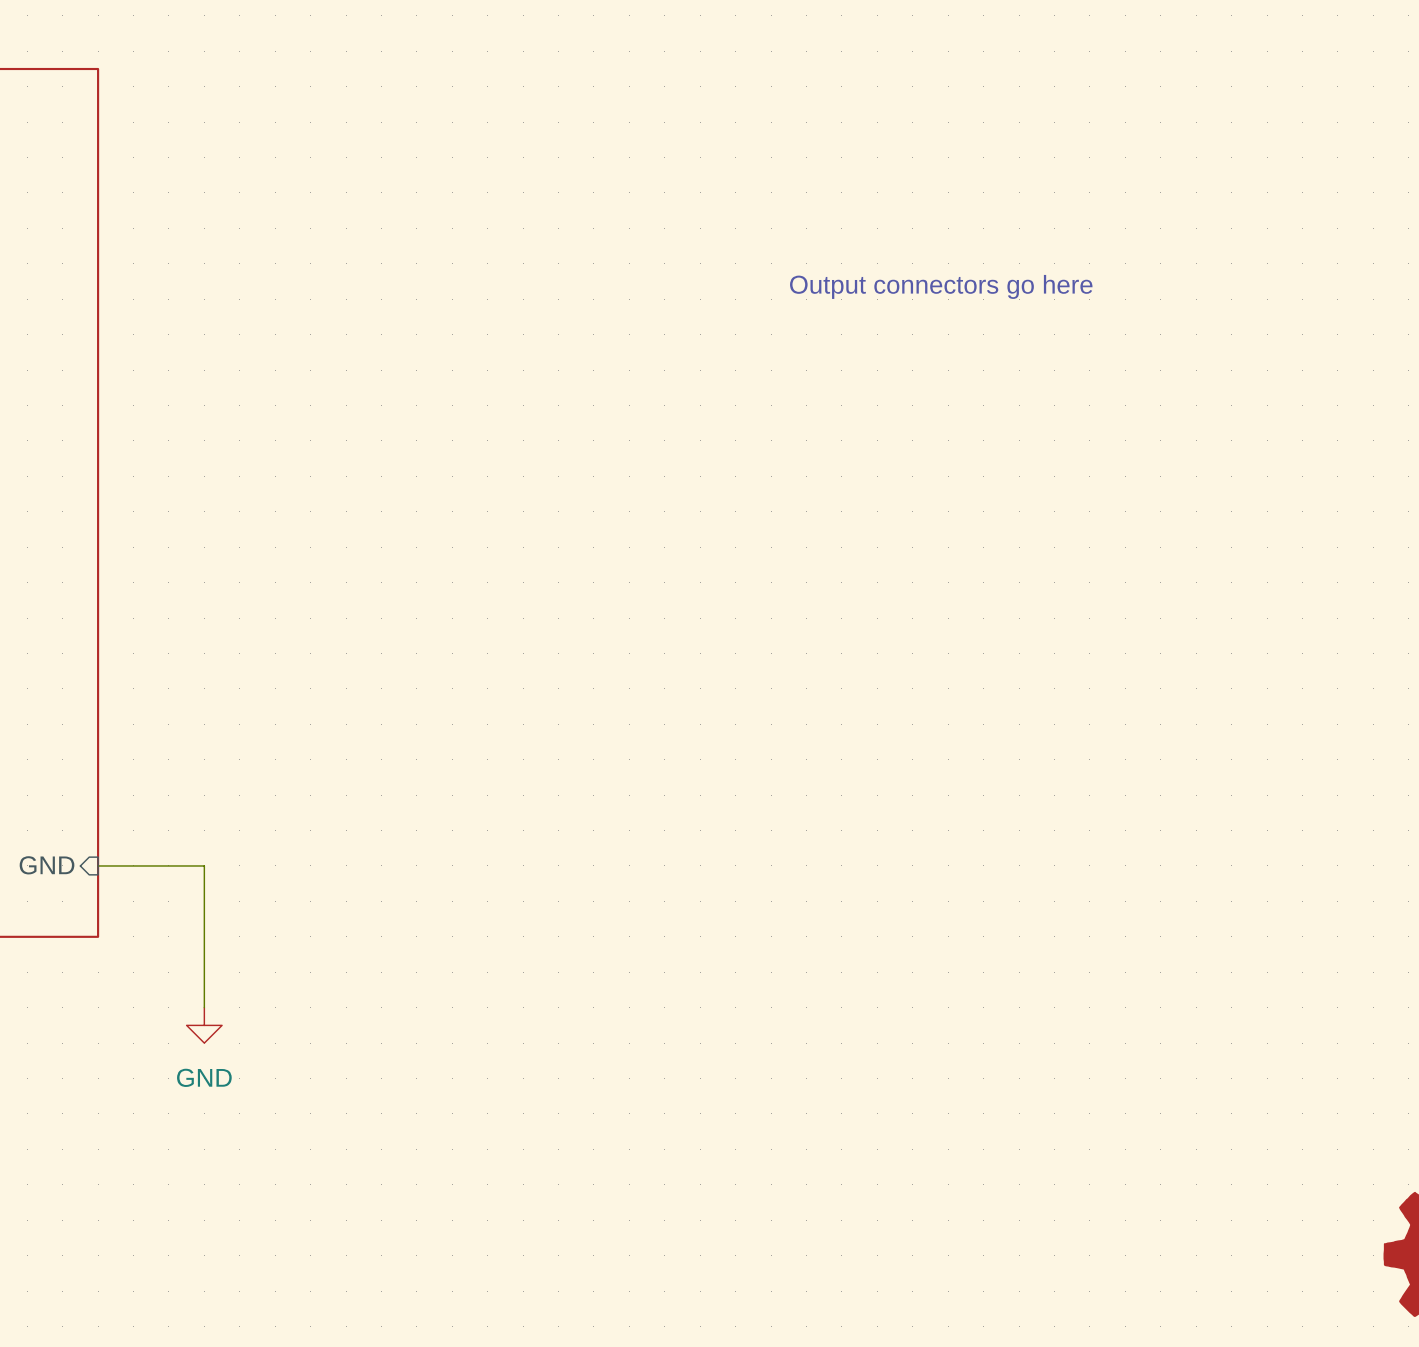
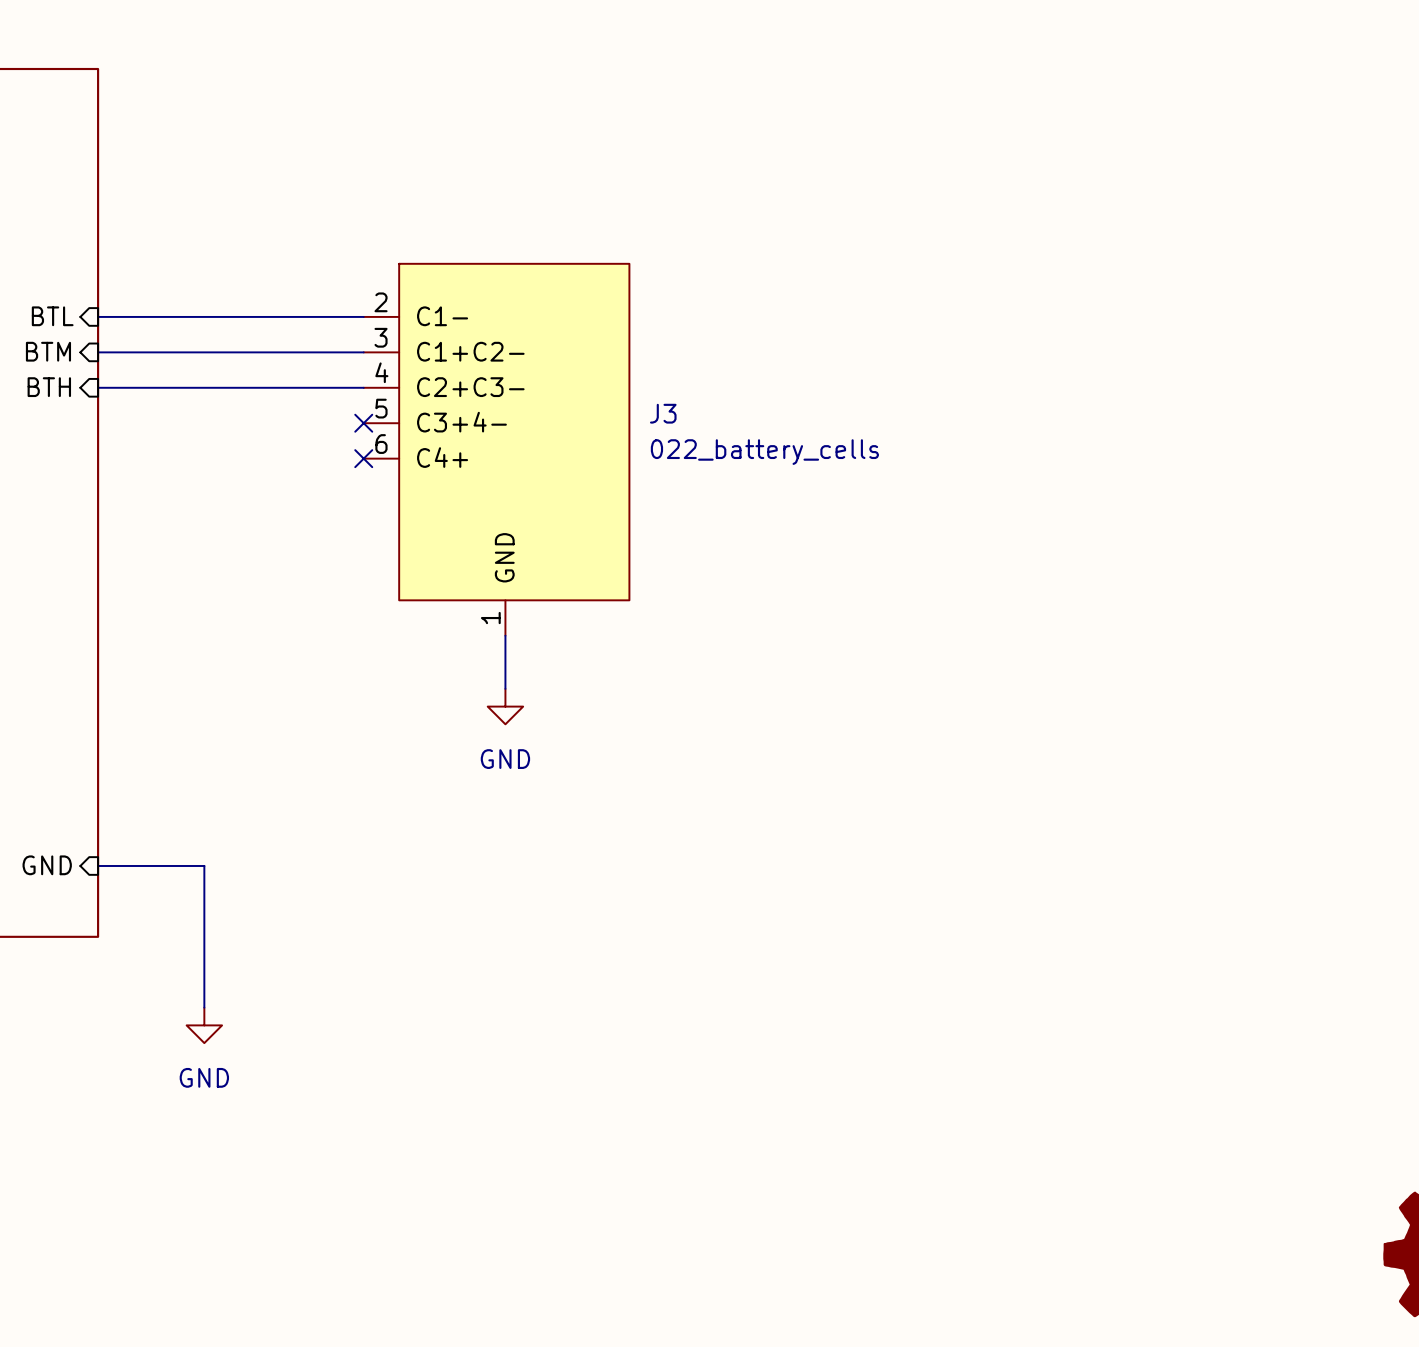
text: Output connectors go here (941, 286) -> none
sheet pin: none -> BTL (52, 316)
wire: none -> (98, 316) (363, 316)
sheet pin: none -> BTM (48, 351)
wire: none -> (98, 352) (363, 352)
sheet pin: none -> BTH (49, 387)
wire: none -> (98, 387) (363, 387)
no-connect mark: none -> (363, 423)
J3: none -> 022_battery_cells (496, 449)
no-connect mark: none -> (363, 458)
wire: none -> (505, 635) (505, 688)
power symbol: none -> GND (505, 706)

